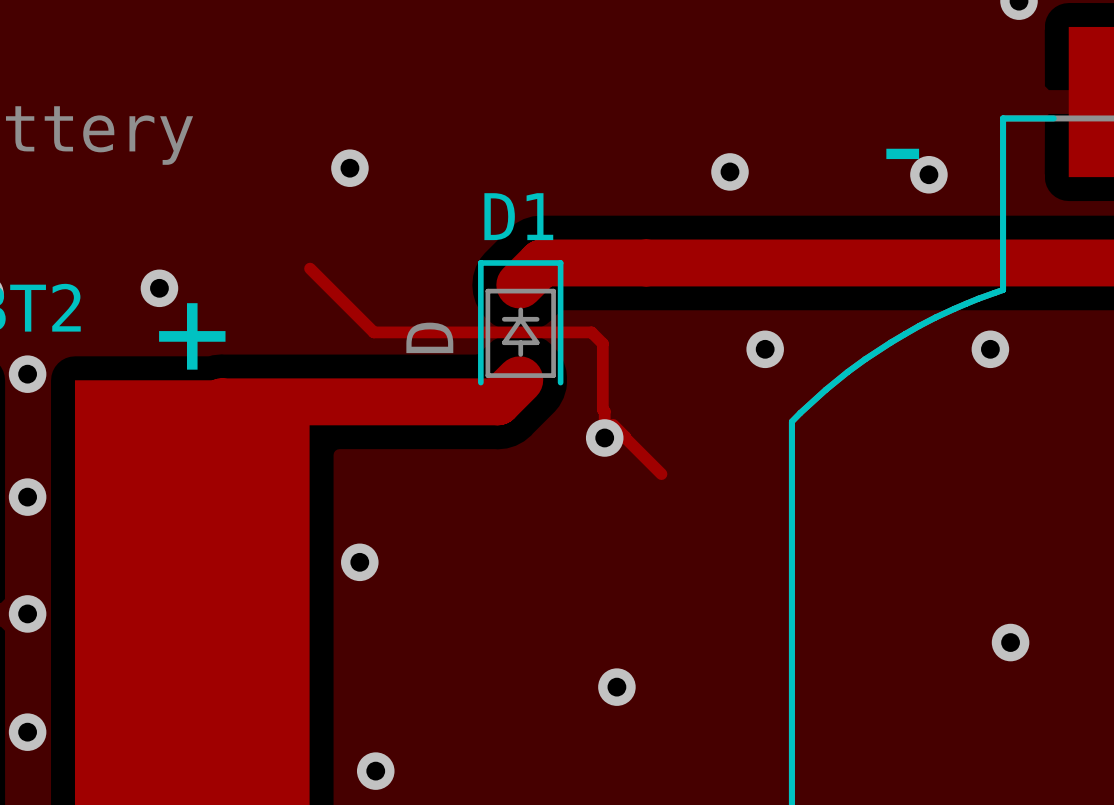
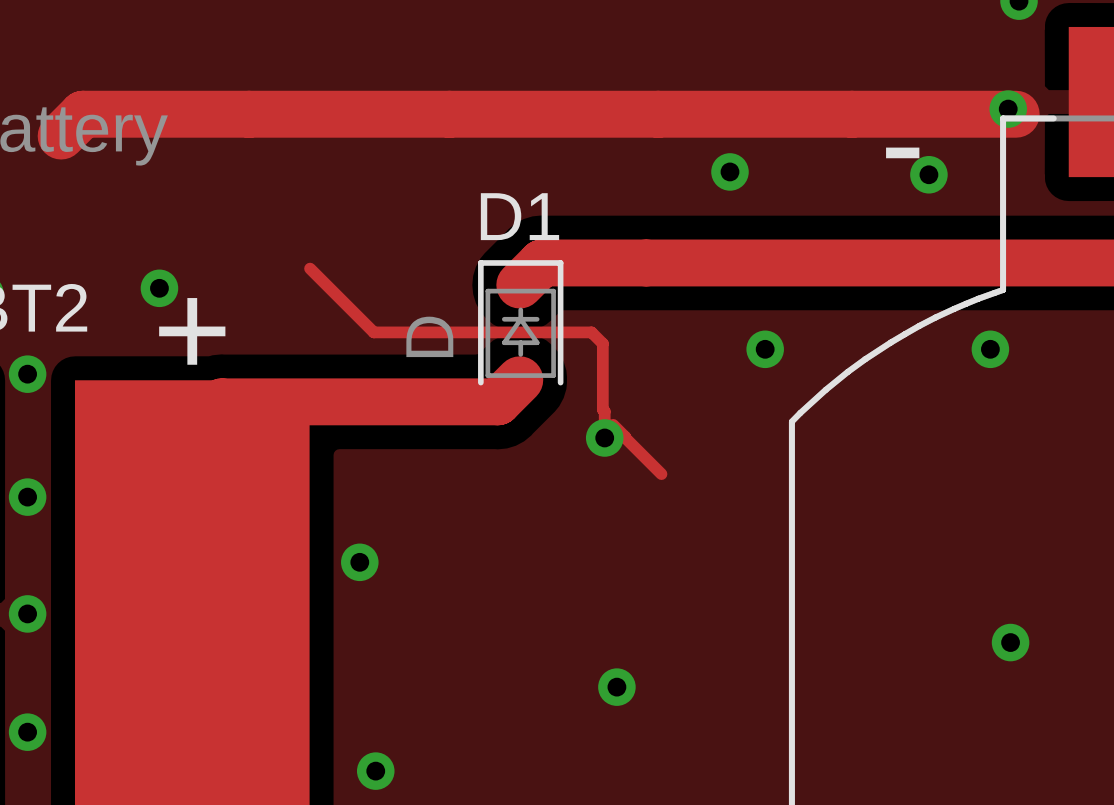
via: none -> (1008, 109)
track: none -> (1016, 114) (82, 114) (61, 136)
via: (349, 168) -> none

